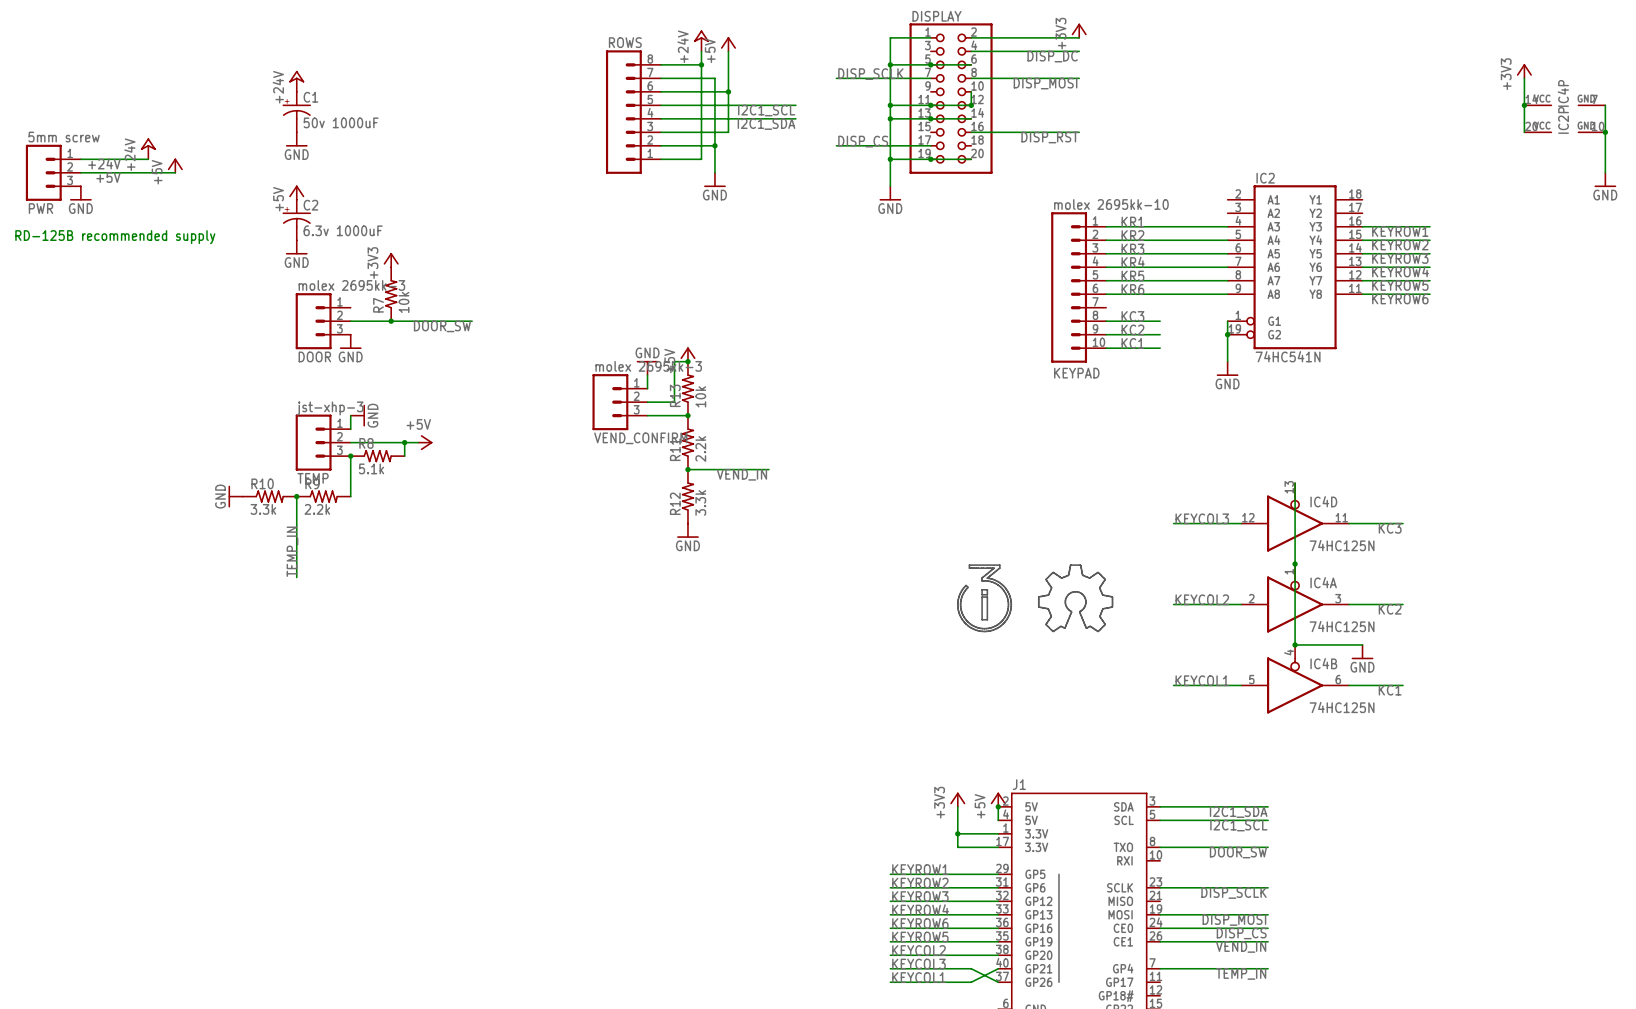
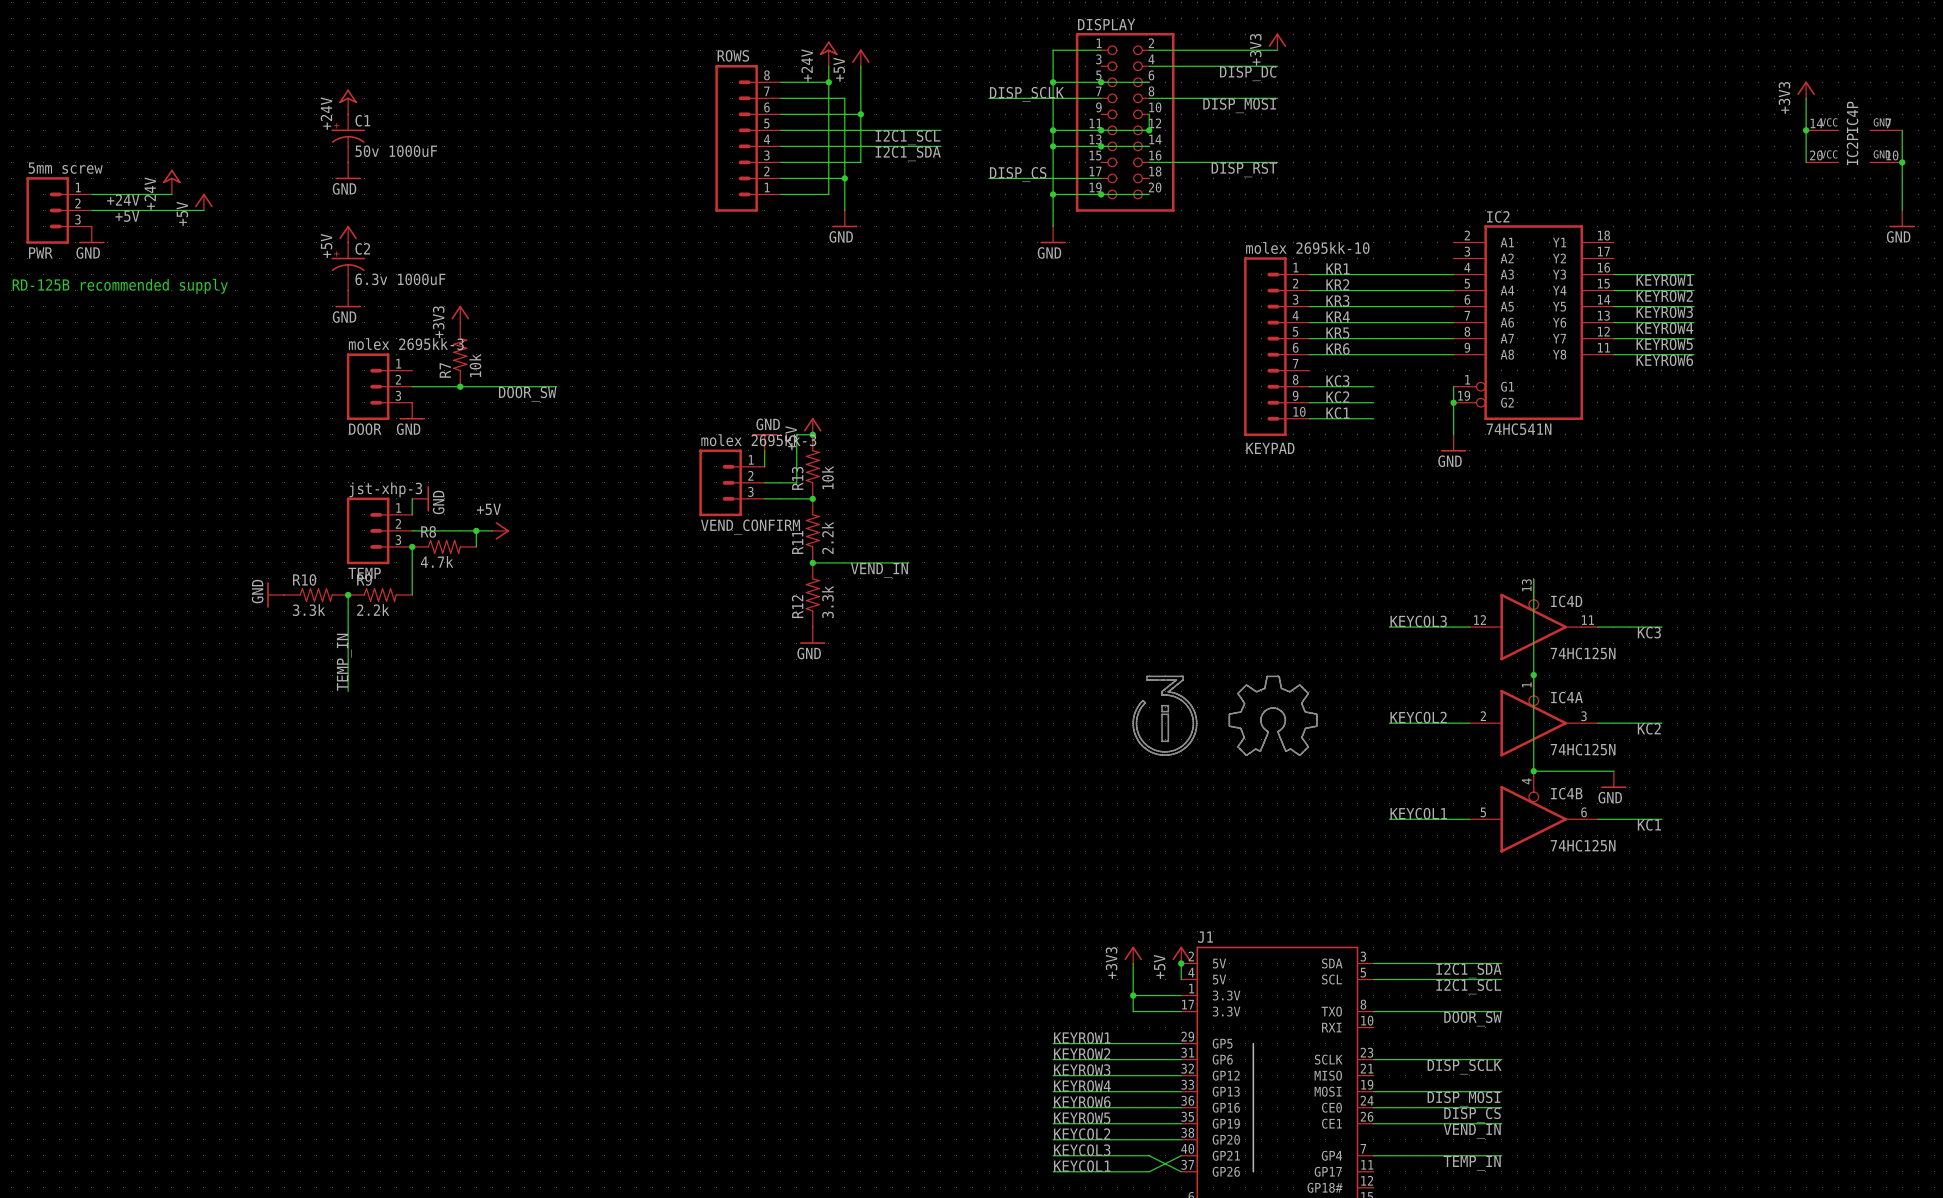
R8 value: 5.1k (371, 468) -> 4.7k (437, 561)

